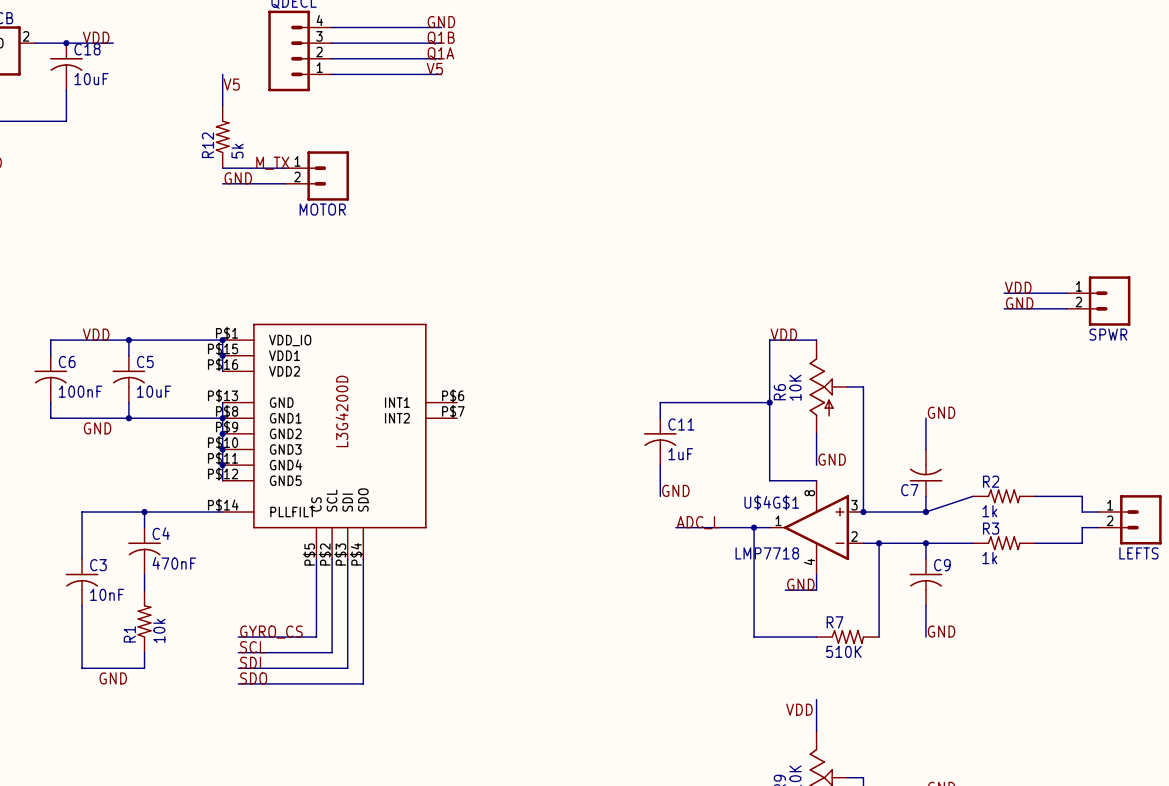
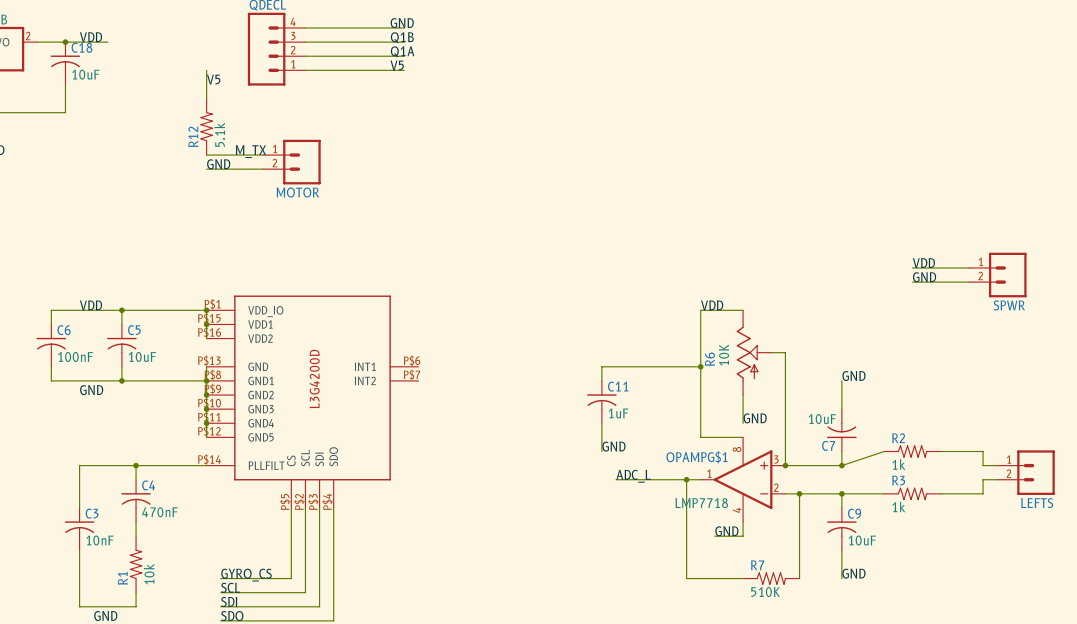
R12 value: 5k (237, 151) -> 5.1k (219, 134)
C7 value: none -> 10uF (822, 419)
U$4G$1 name: U$4G$1 (771, 502) -> OPAMPG$1 (696, 457)
C9 value: none -> 10uF (862, 540)

